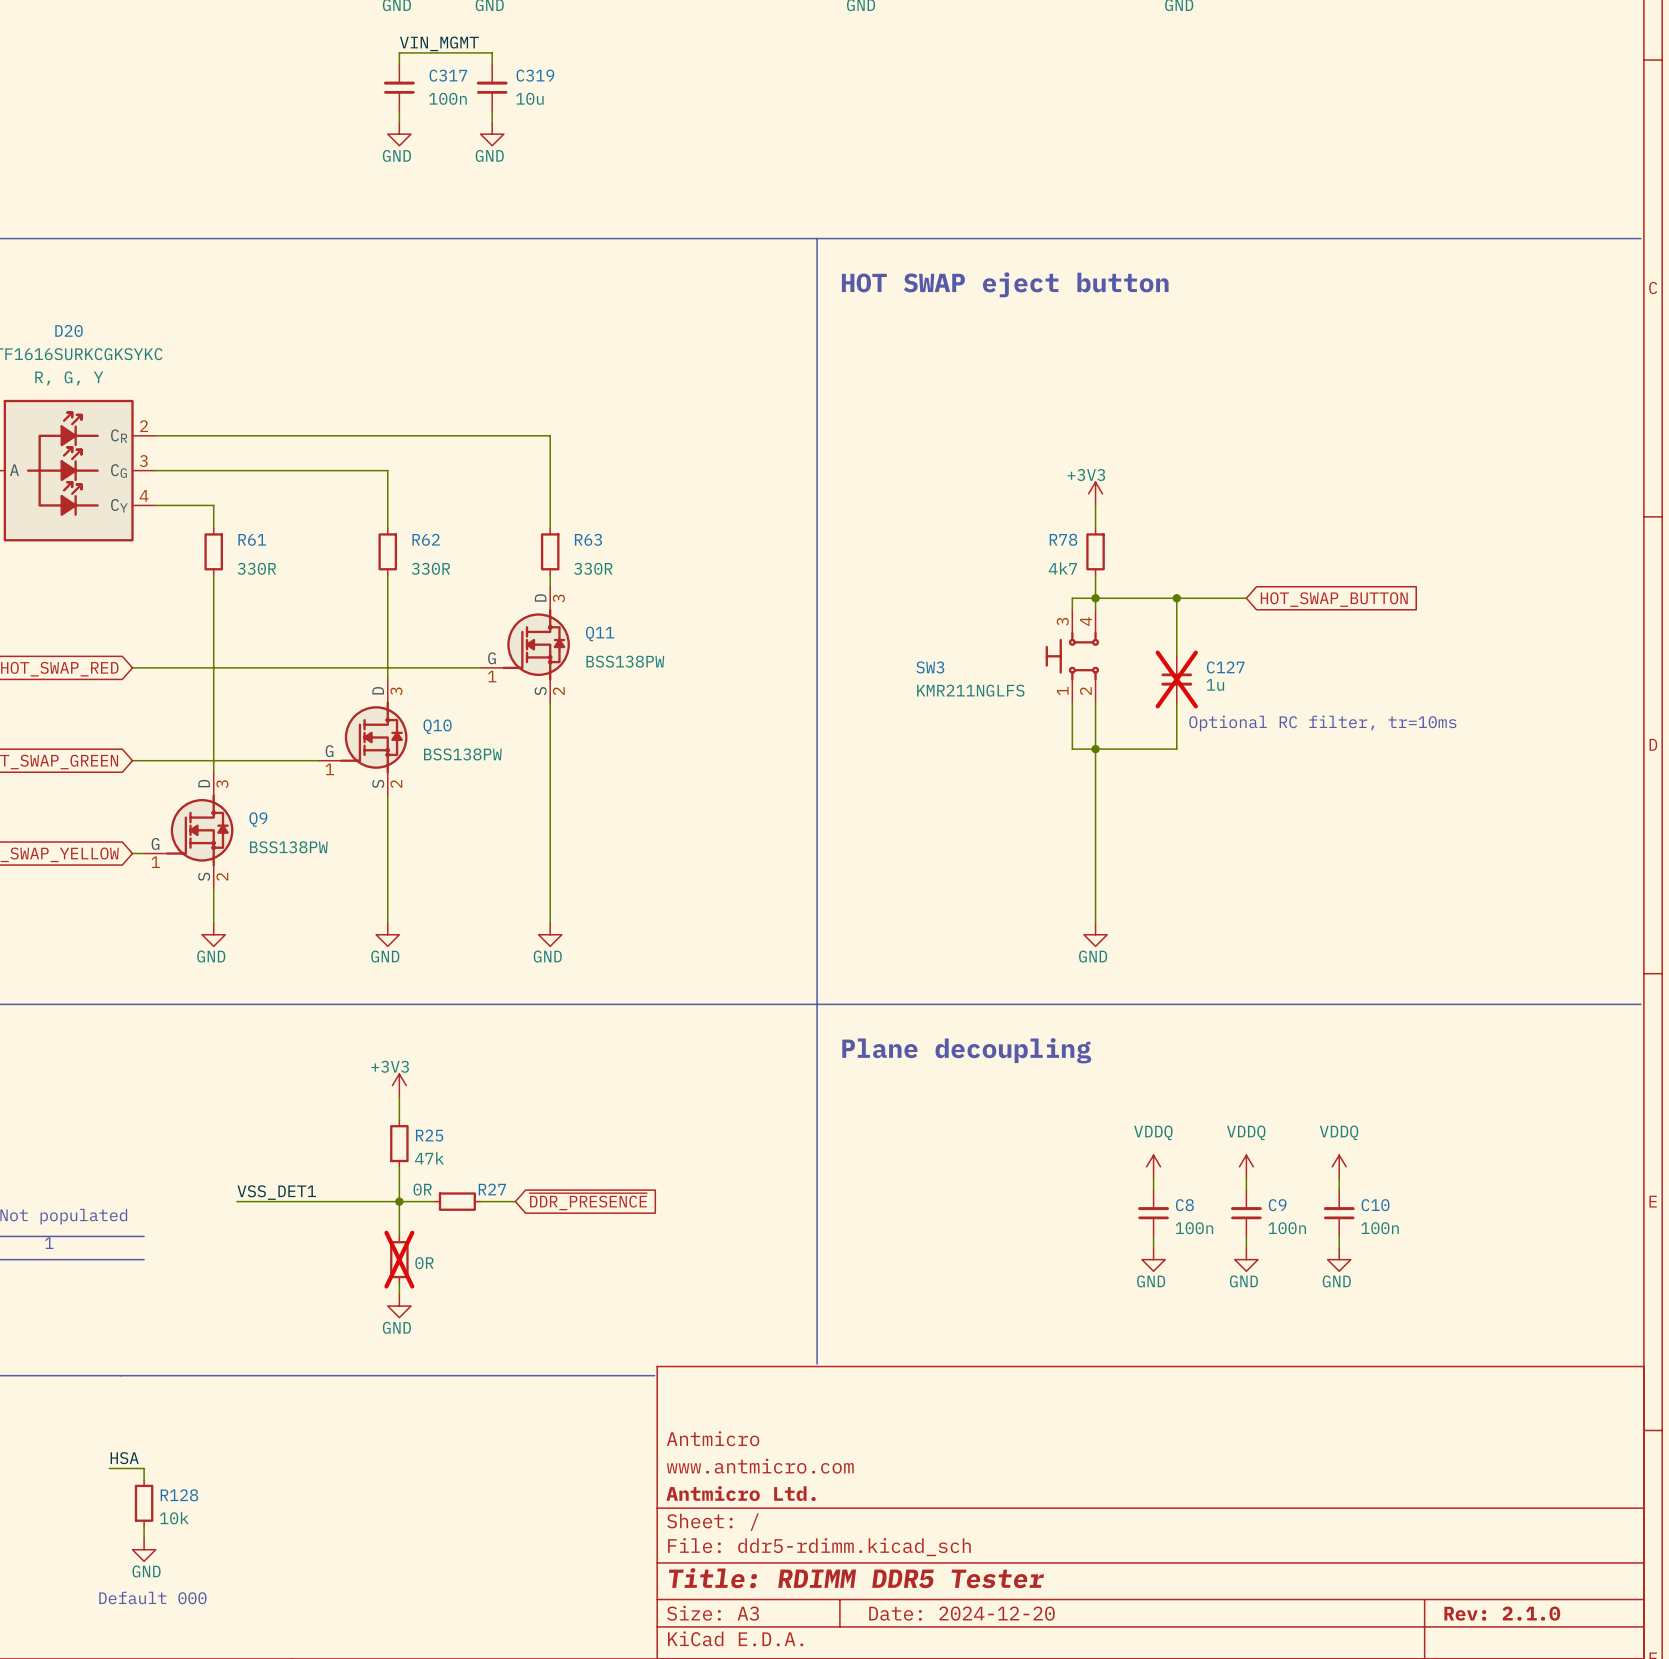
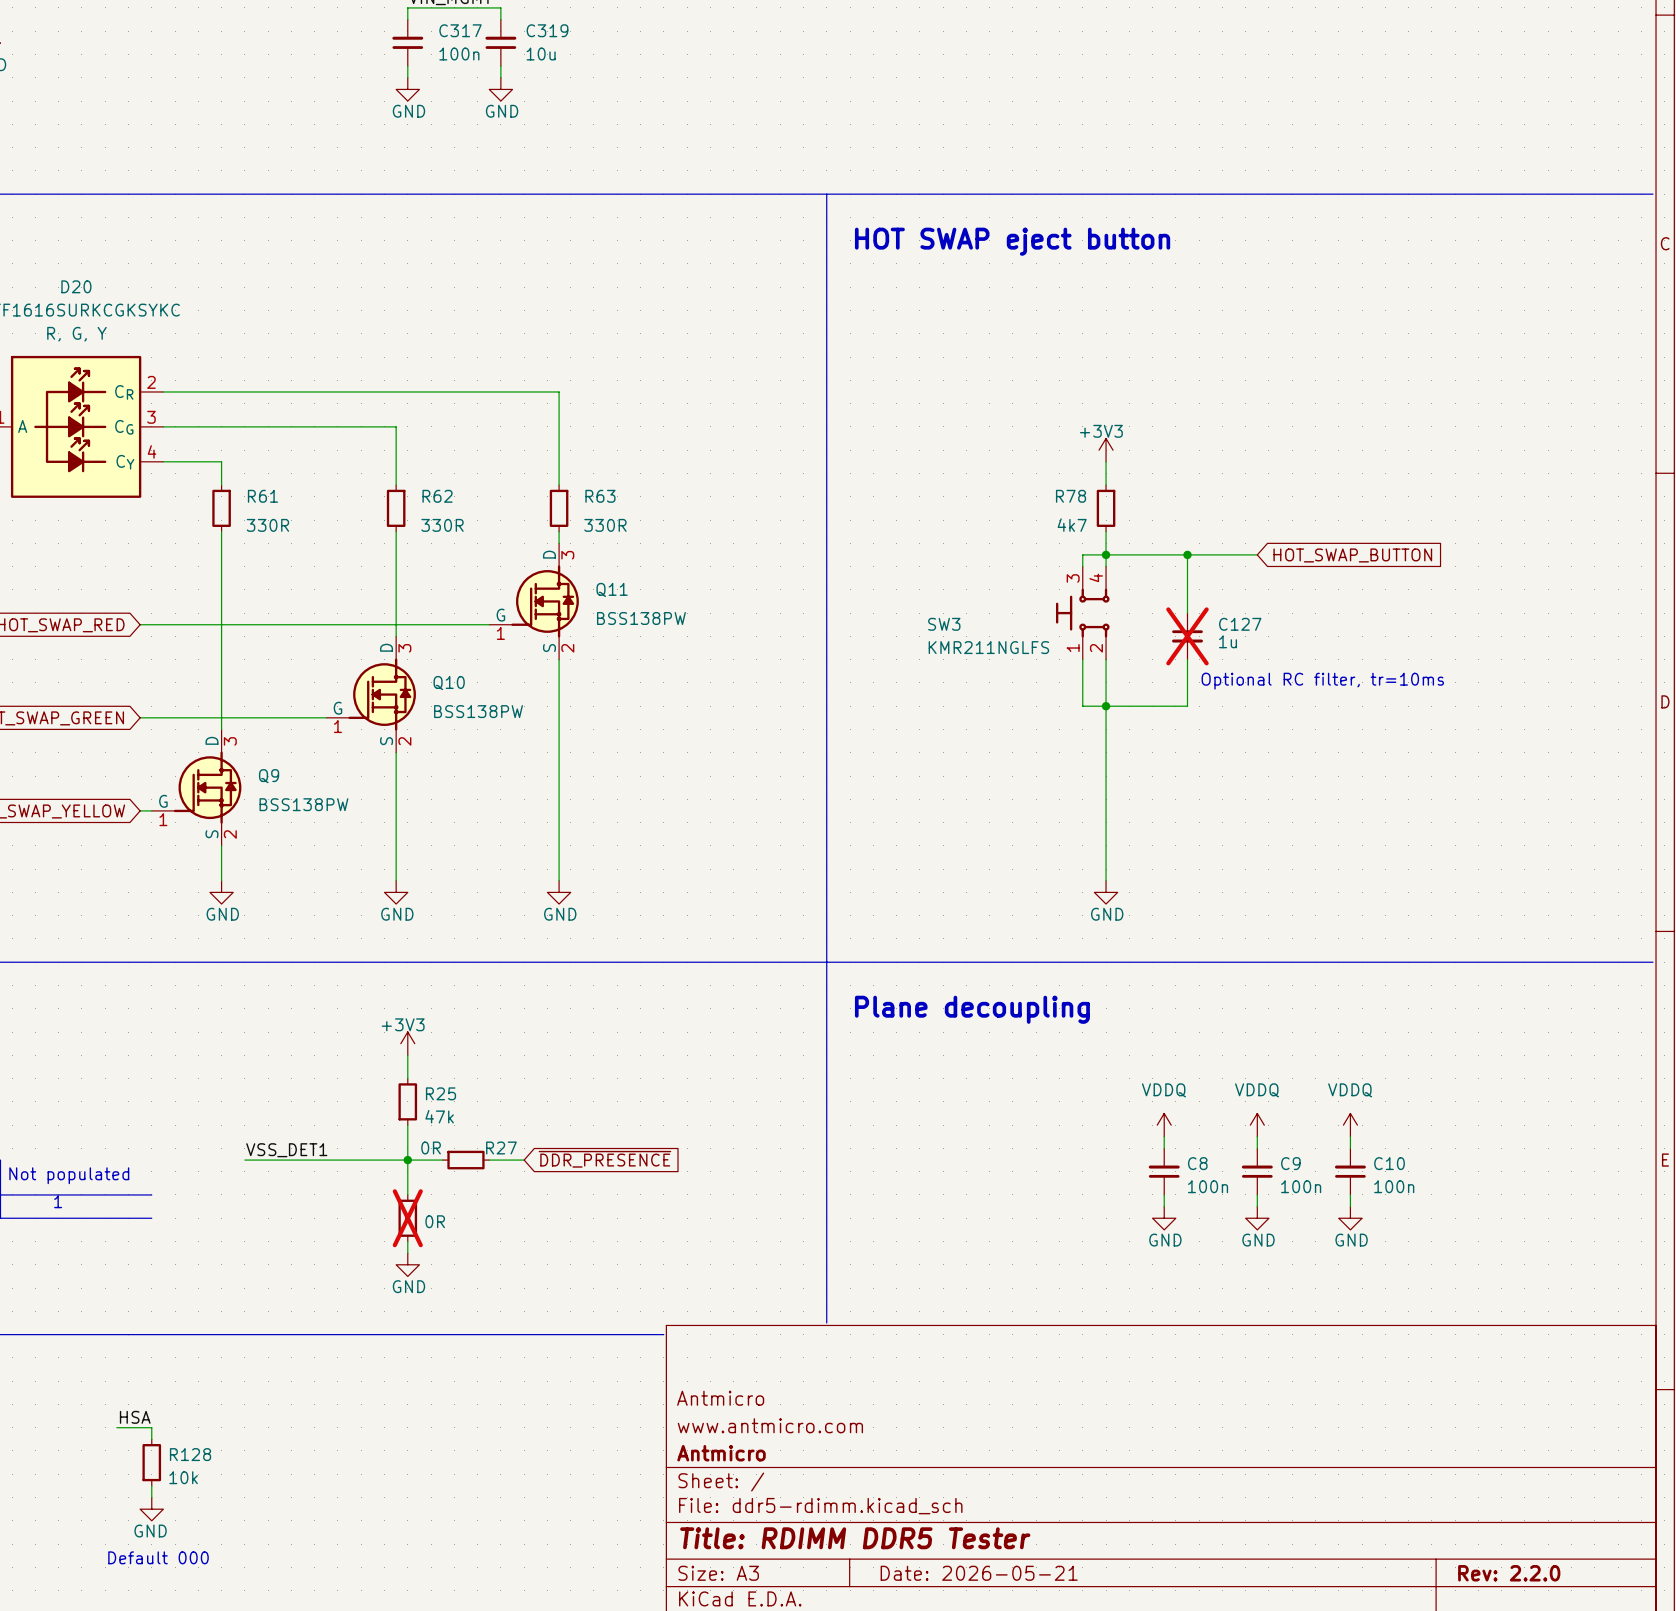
title block: Antmicro Ltd. (741, 1493) -> Antmicro (721, 1453)
title block: Date: 2024-12-20 (961, 1613) -> Date: 2026-05-21 (979, 1573)
title block: Rev: 2.1.0 (1502, 1613) -> Rev: 2.2.0 (1509, 1573)

